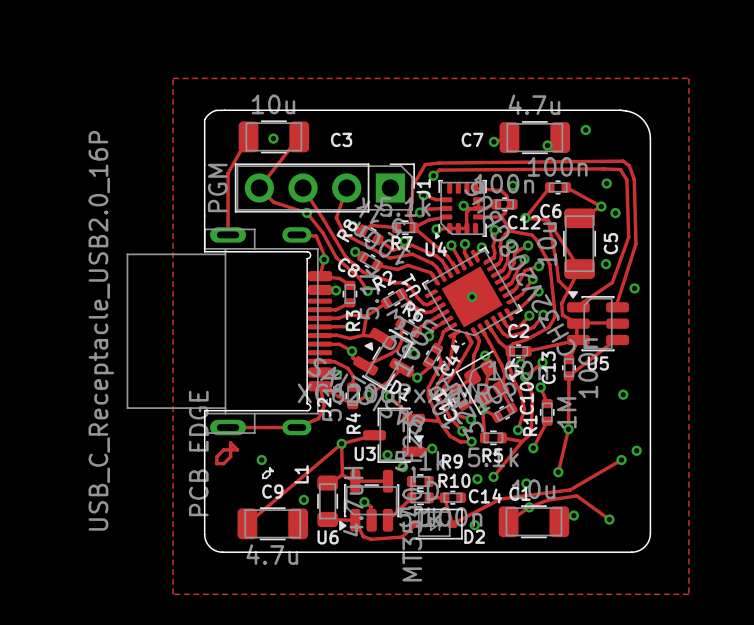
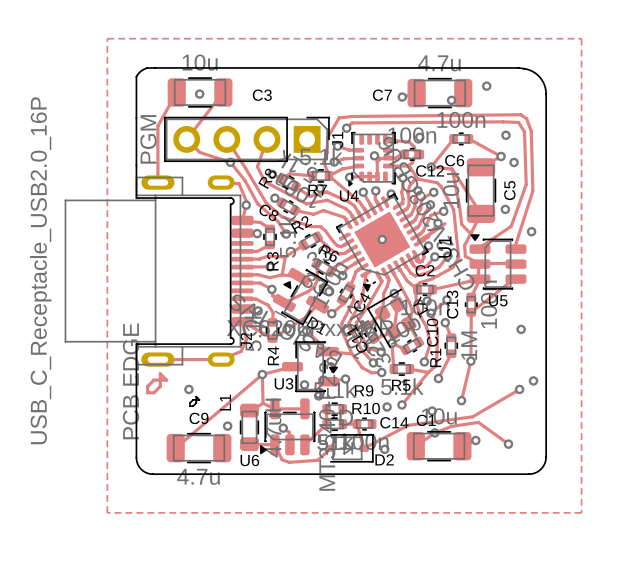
track: none -> (445, 223) (418, 240)
U1 name rotation: 0° (410, 285) -> 30° clockwise (445, 247)
U1 name position: U1 (410, 285) -> U1 (445, 247)
track: (538, 291) (517, 310) (509, 314) -> none
via position: (538, 291) -> (428, 245)
track: none -> (428, 245) (423, 252) (422, 261) (417, 261) (414, 256)

